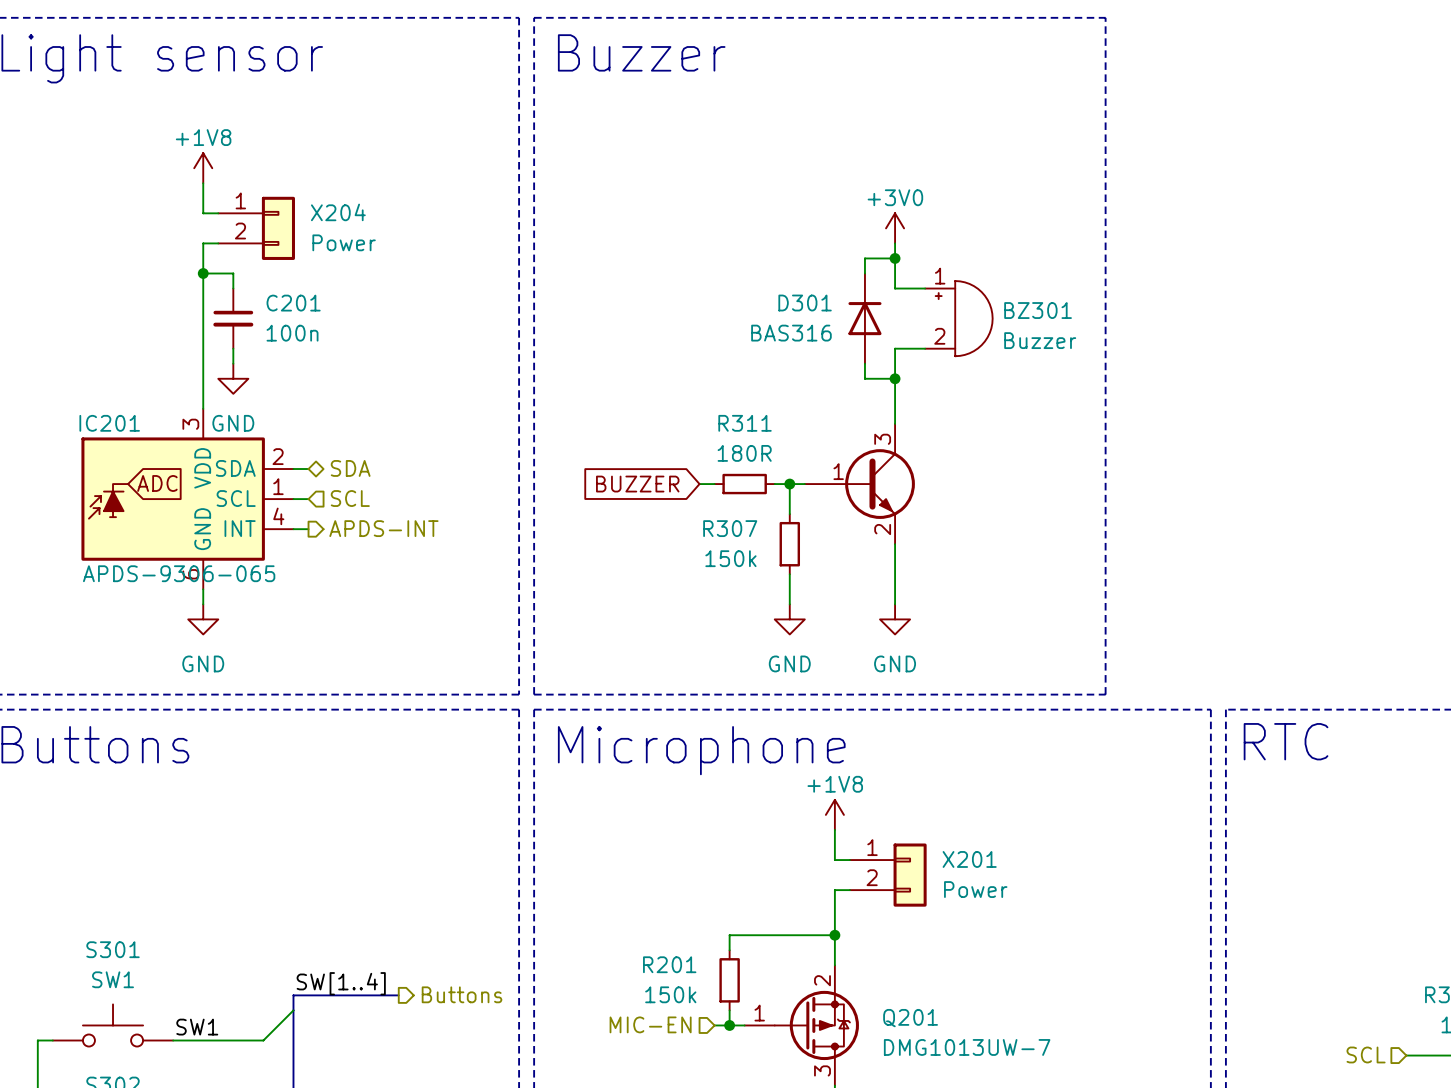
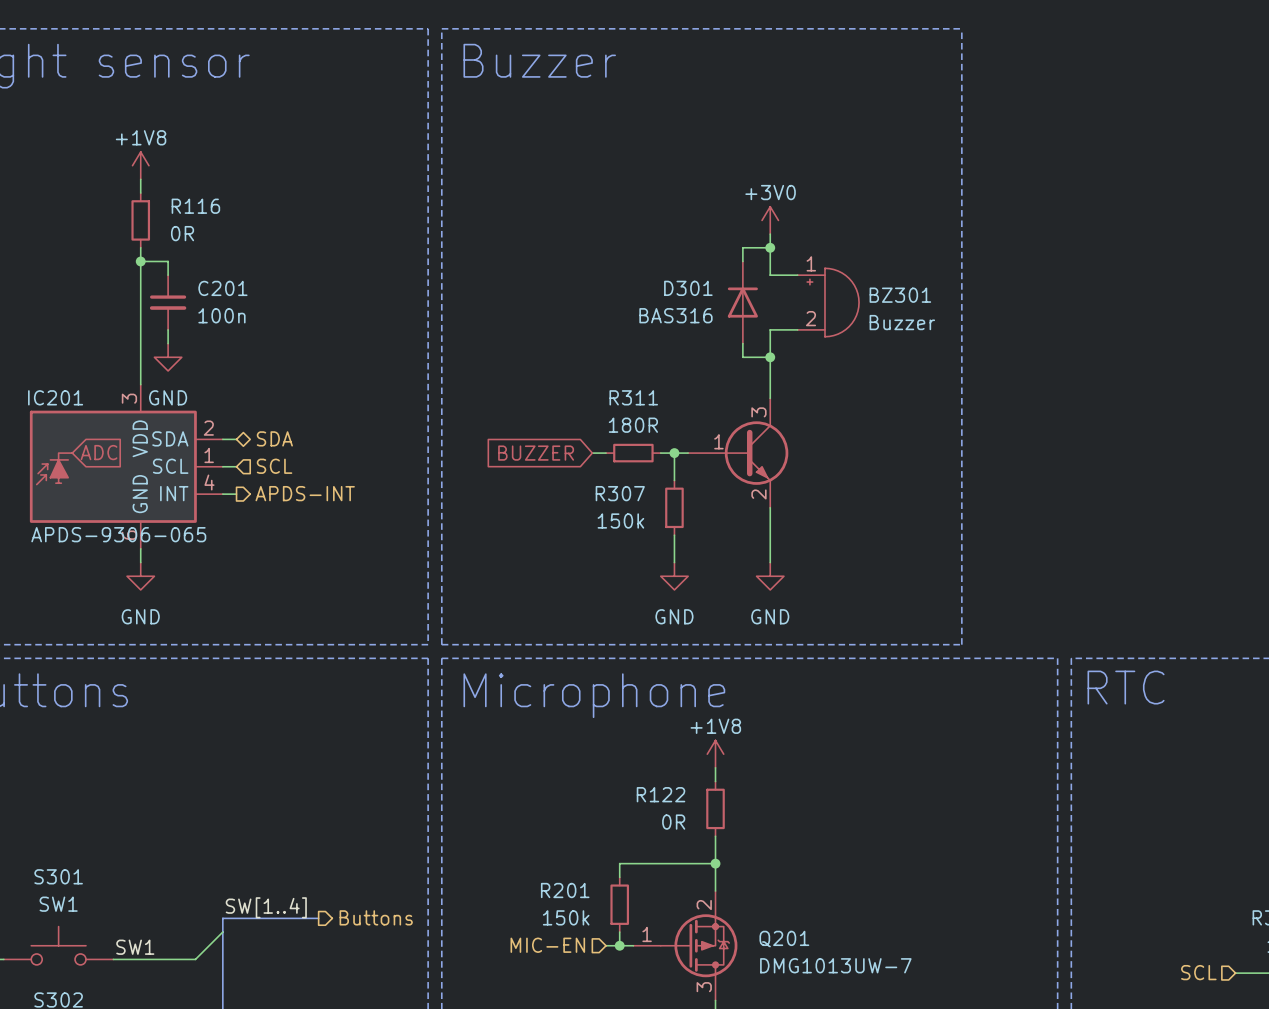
wire: (203, 198) (203, 213) (218, 213) -> none
R116: none -> 0R (140, 220)
X204: Power (256, 228) -> none
wire: (218, 243) (203, 243) (203, 258) -> none
wire: (834, 844) (834, 860) (849, 860) -> none
R122: none -> 0R (715, 808)
X201: Power (888, 875) -> none
wire: (849, 890) (834, 890) (834, 905) -> none

